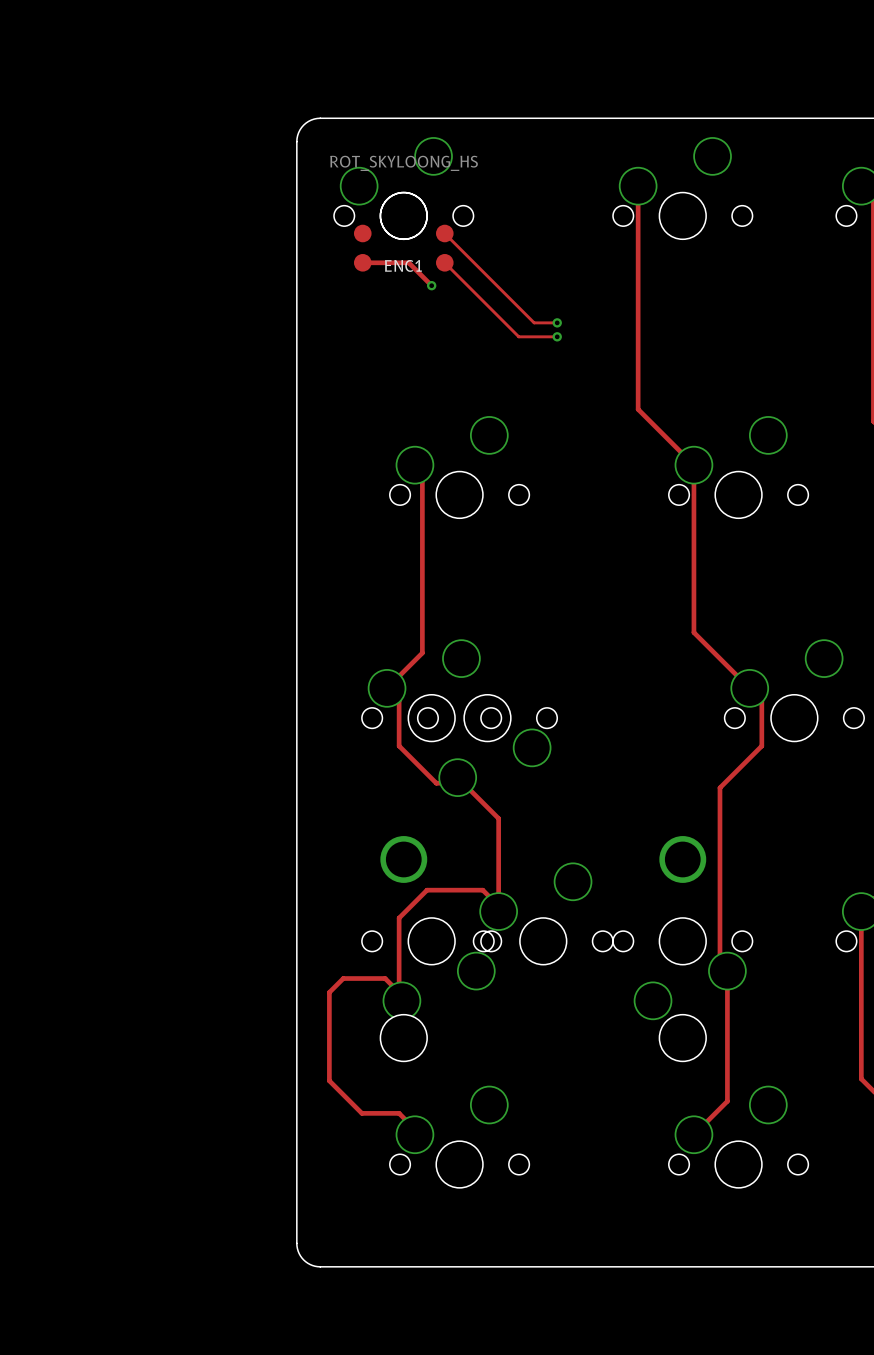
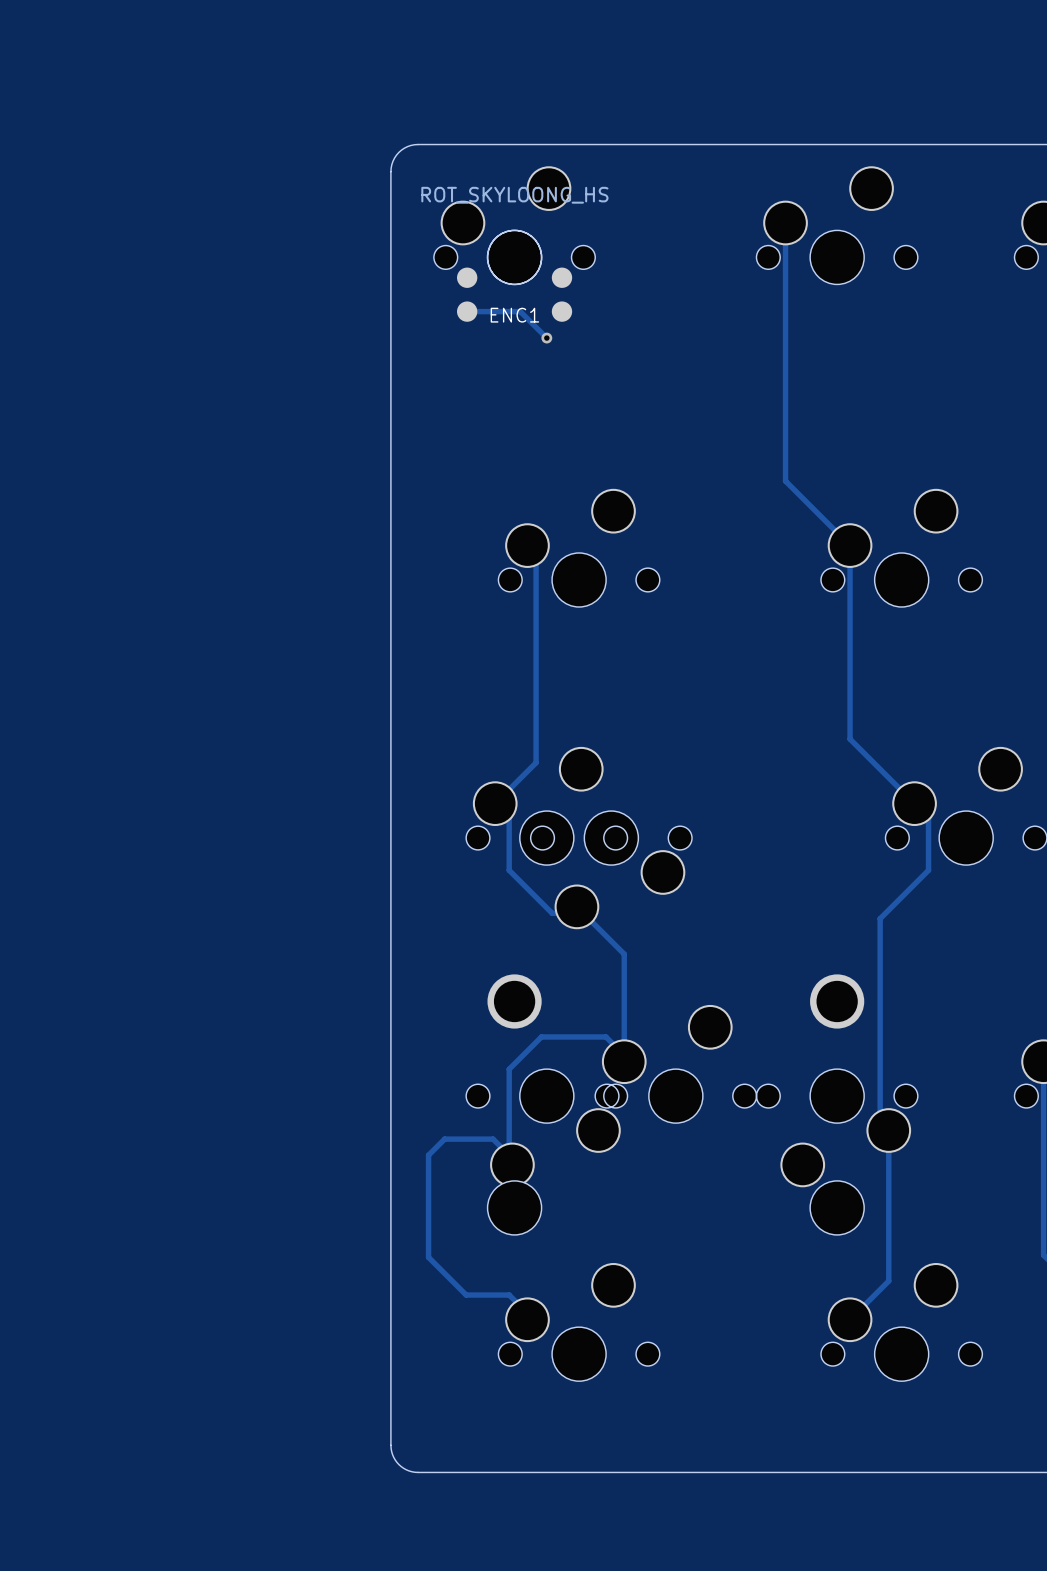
track: (444, 233) (534, 322) (557, 322) -> none
track: (444, 262) (518, 336) (557, 336) -> none
via: (557, 322) -> none
via: (557, 336) -> none

